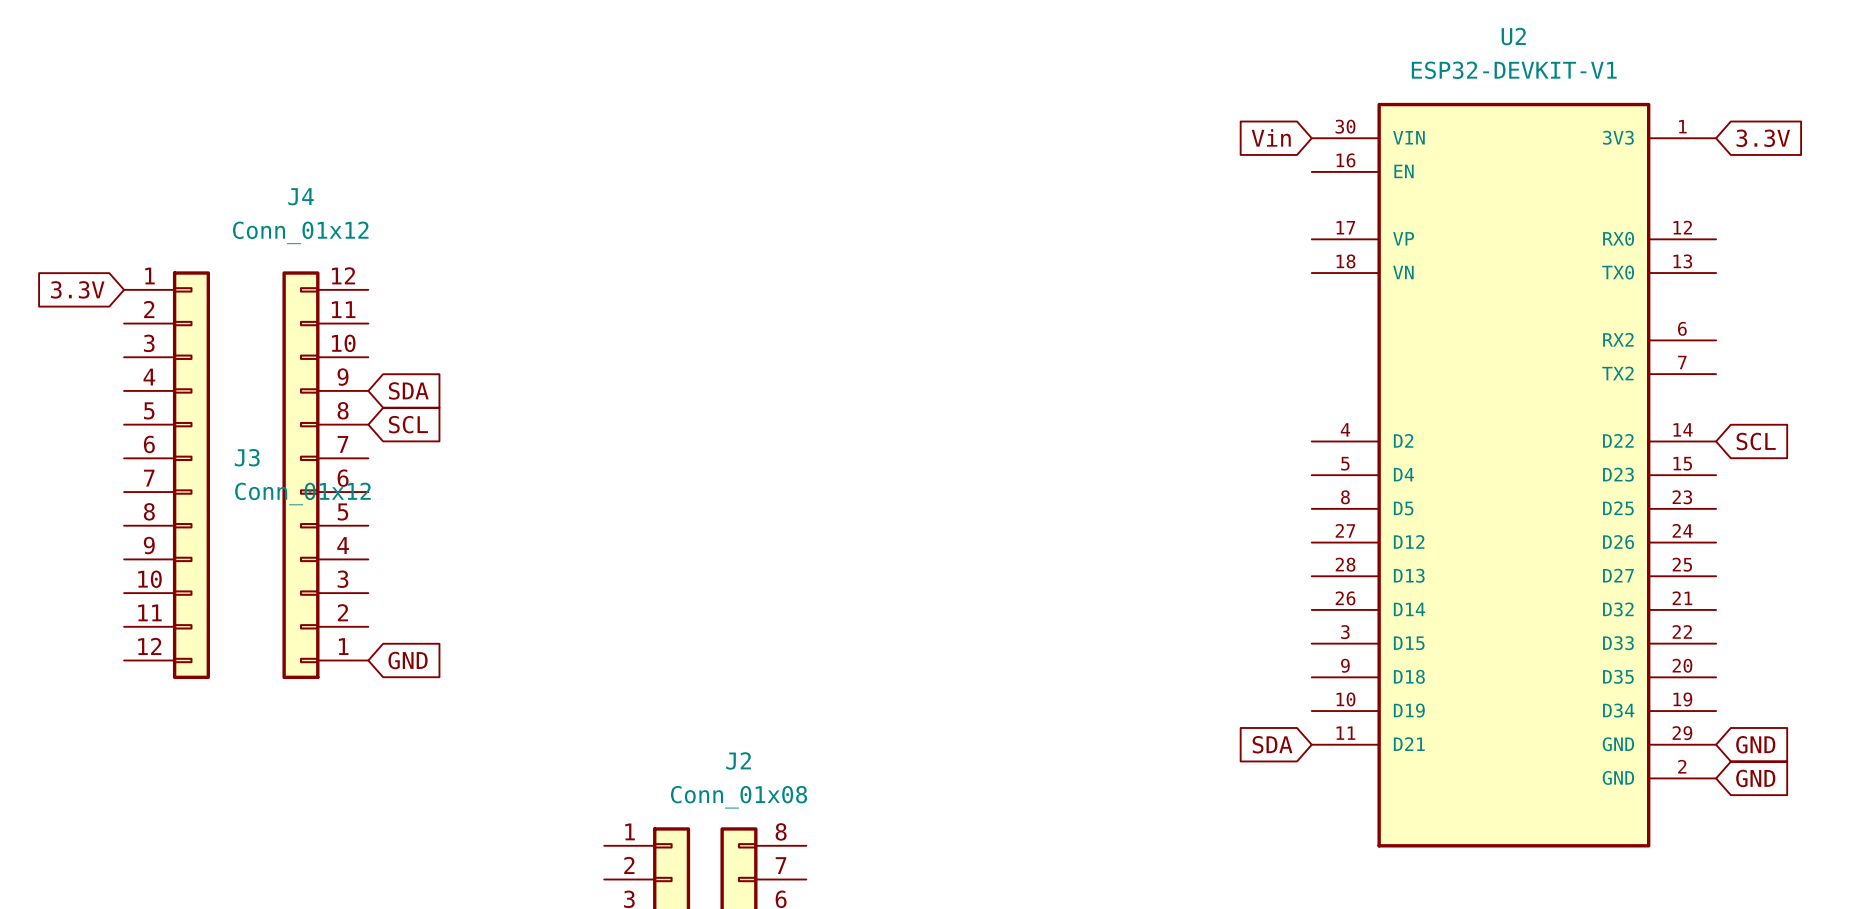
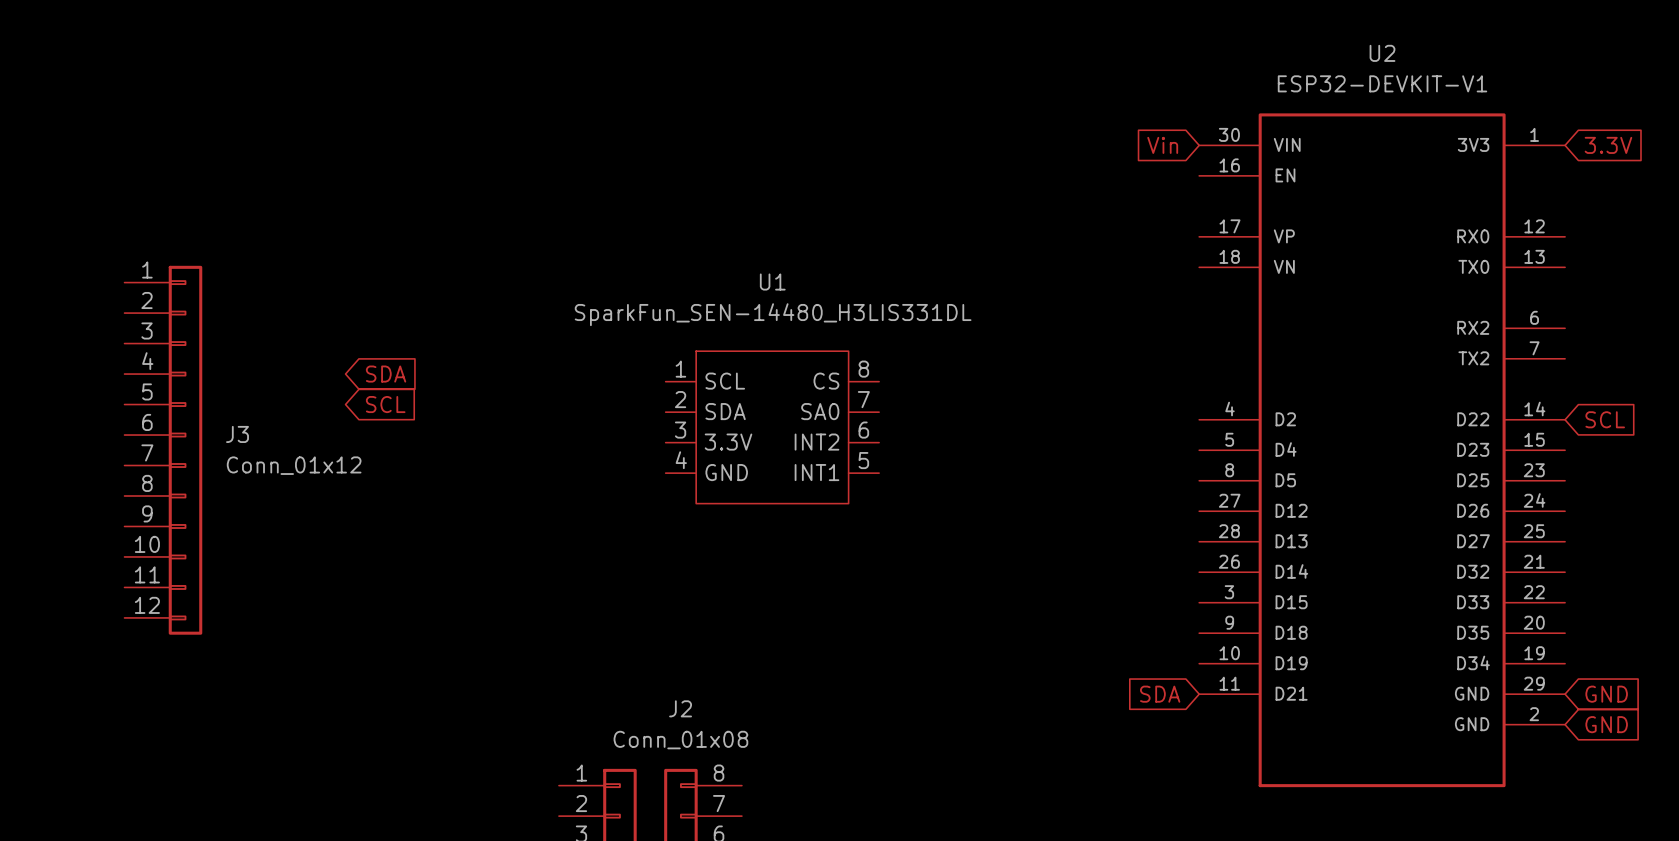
global label: 3.3V (77, 289) -> none
U1: none -> SparkFun_SEN-14480_H3LIS331DL (772, 427)
J4: Conn_01x12 (325, 475) -> none
global label: GND (408, 660) -> none

